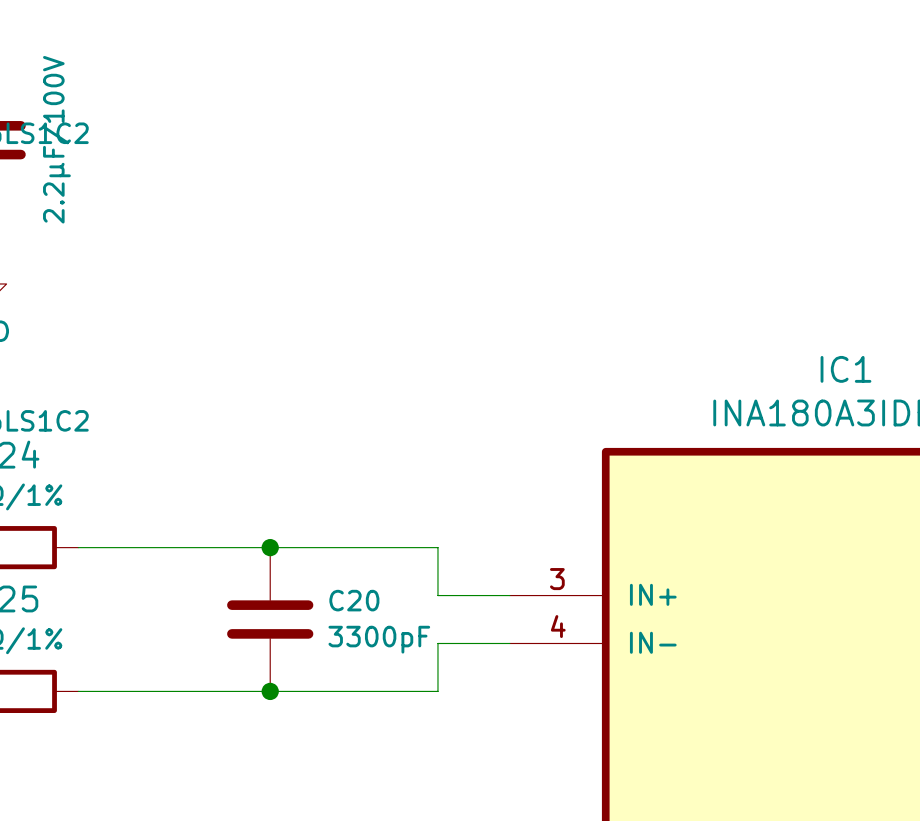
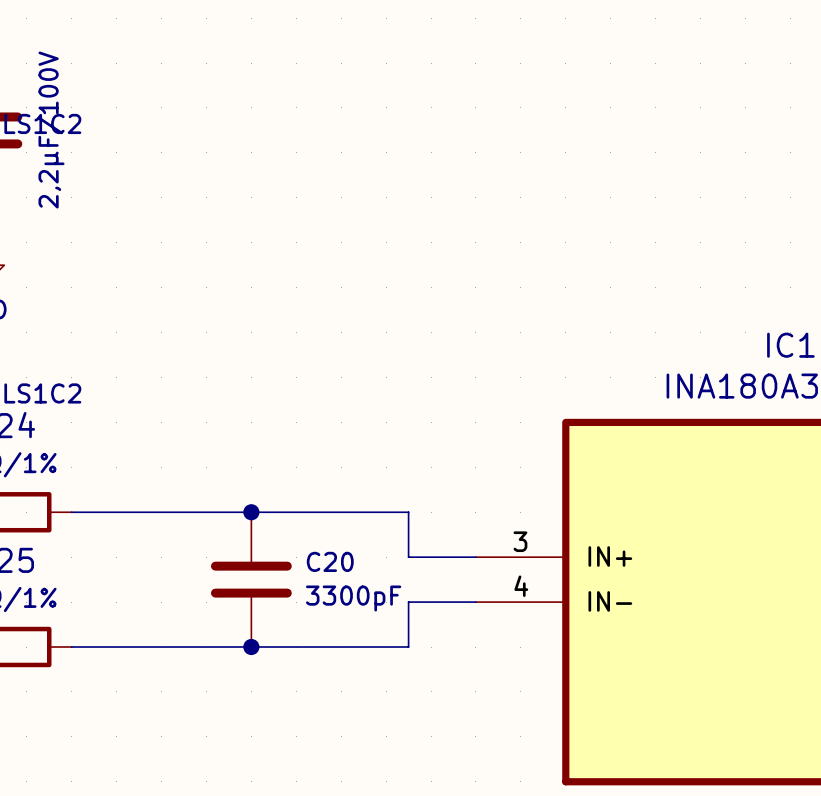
part value: 2.2μF/100V (56, 139) -> 2,2μF/100V (51, 130)

